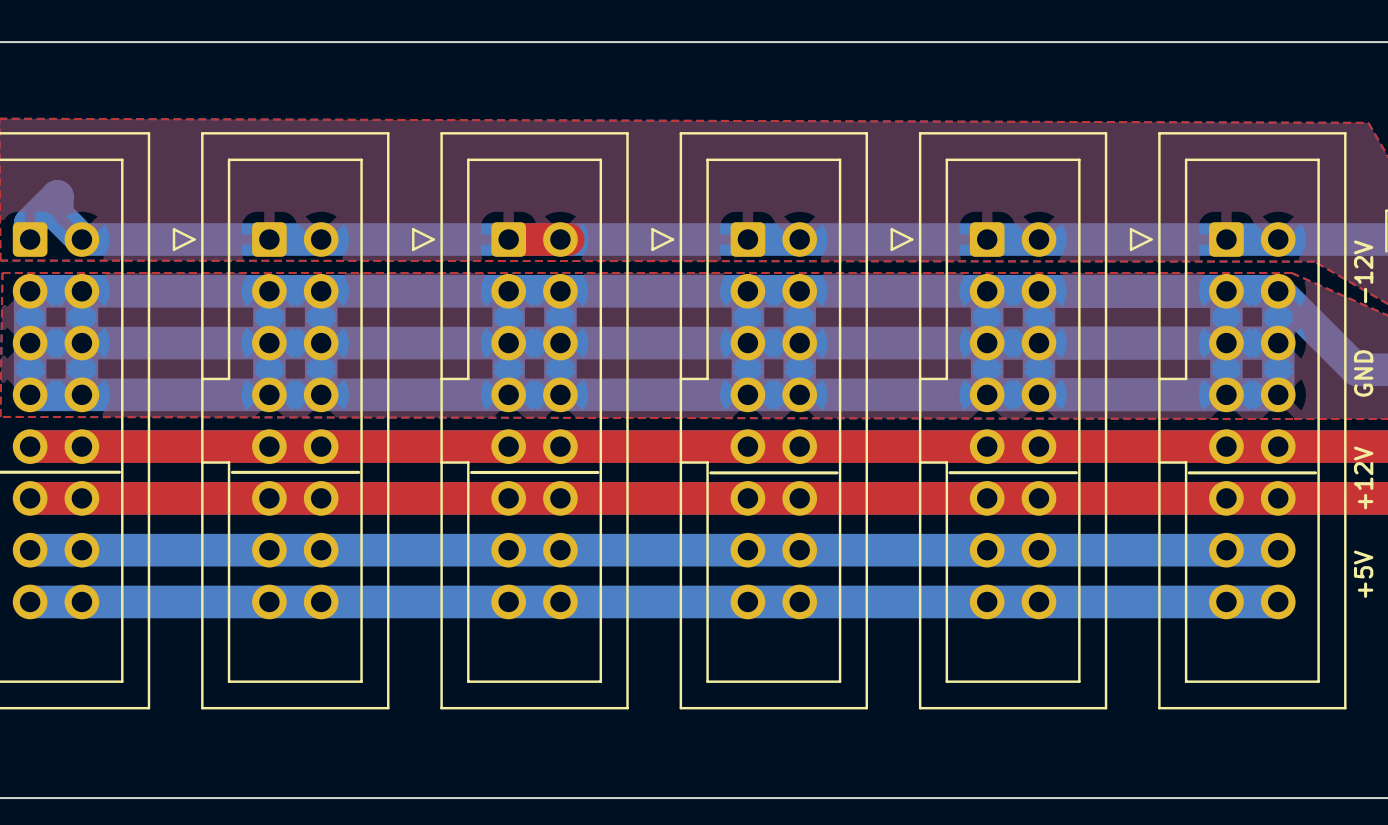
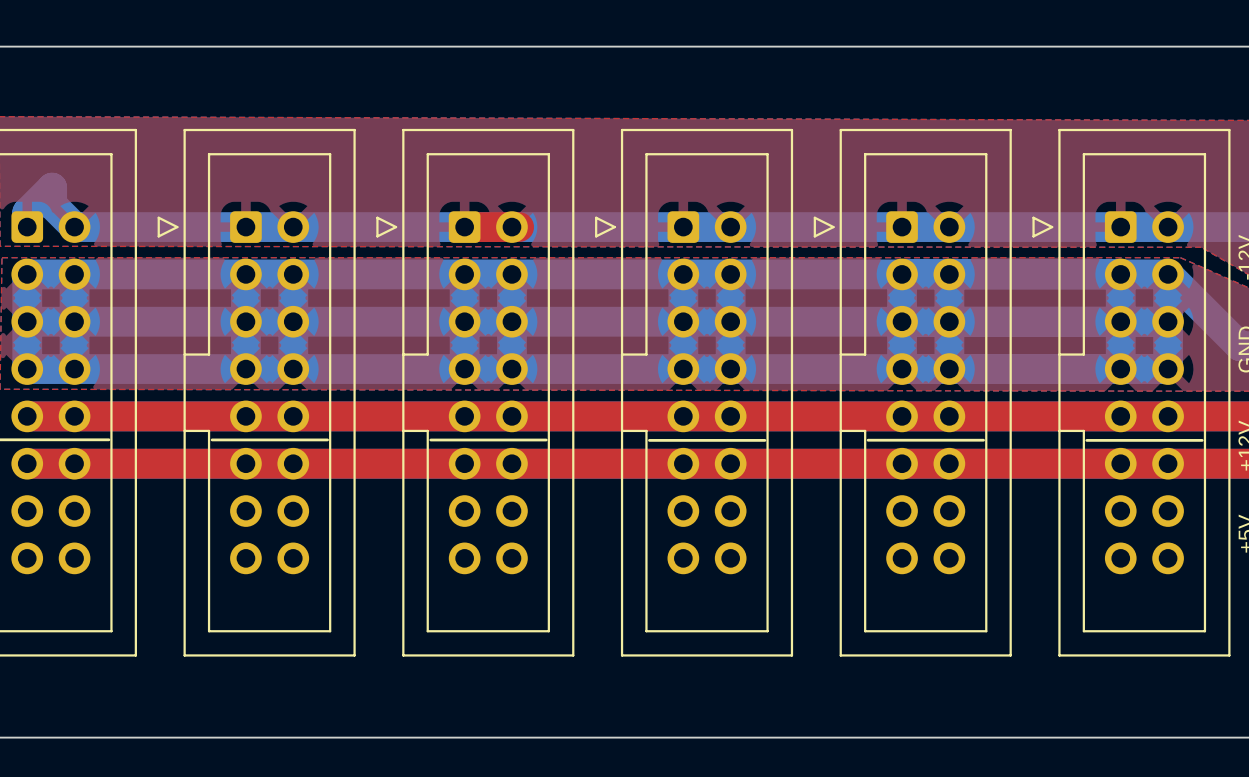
bottom track: (30, 550) (1278, 550) -> none
bottom track: (30, 601) (1278, 601) -> none

